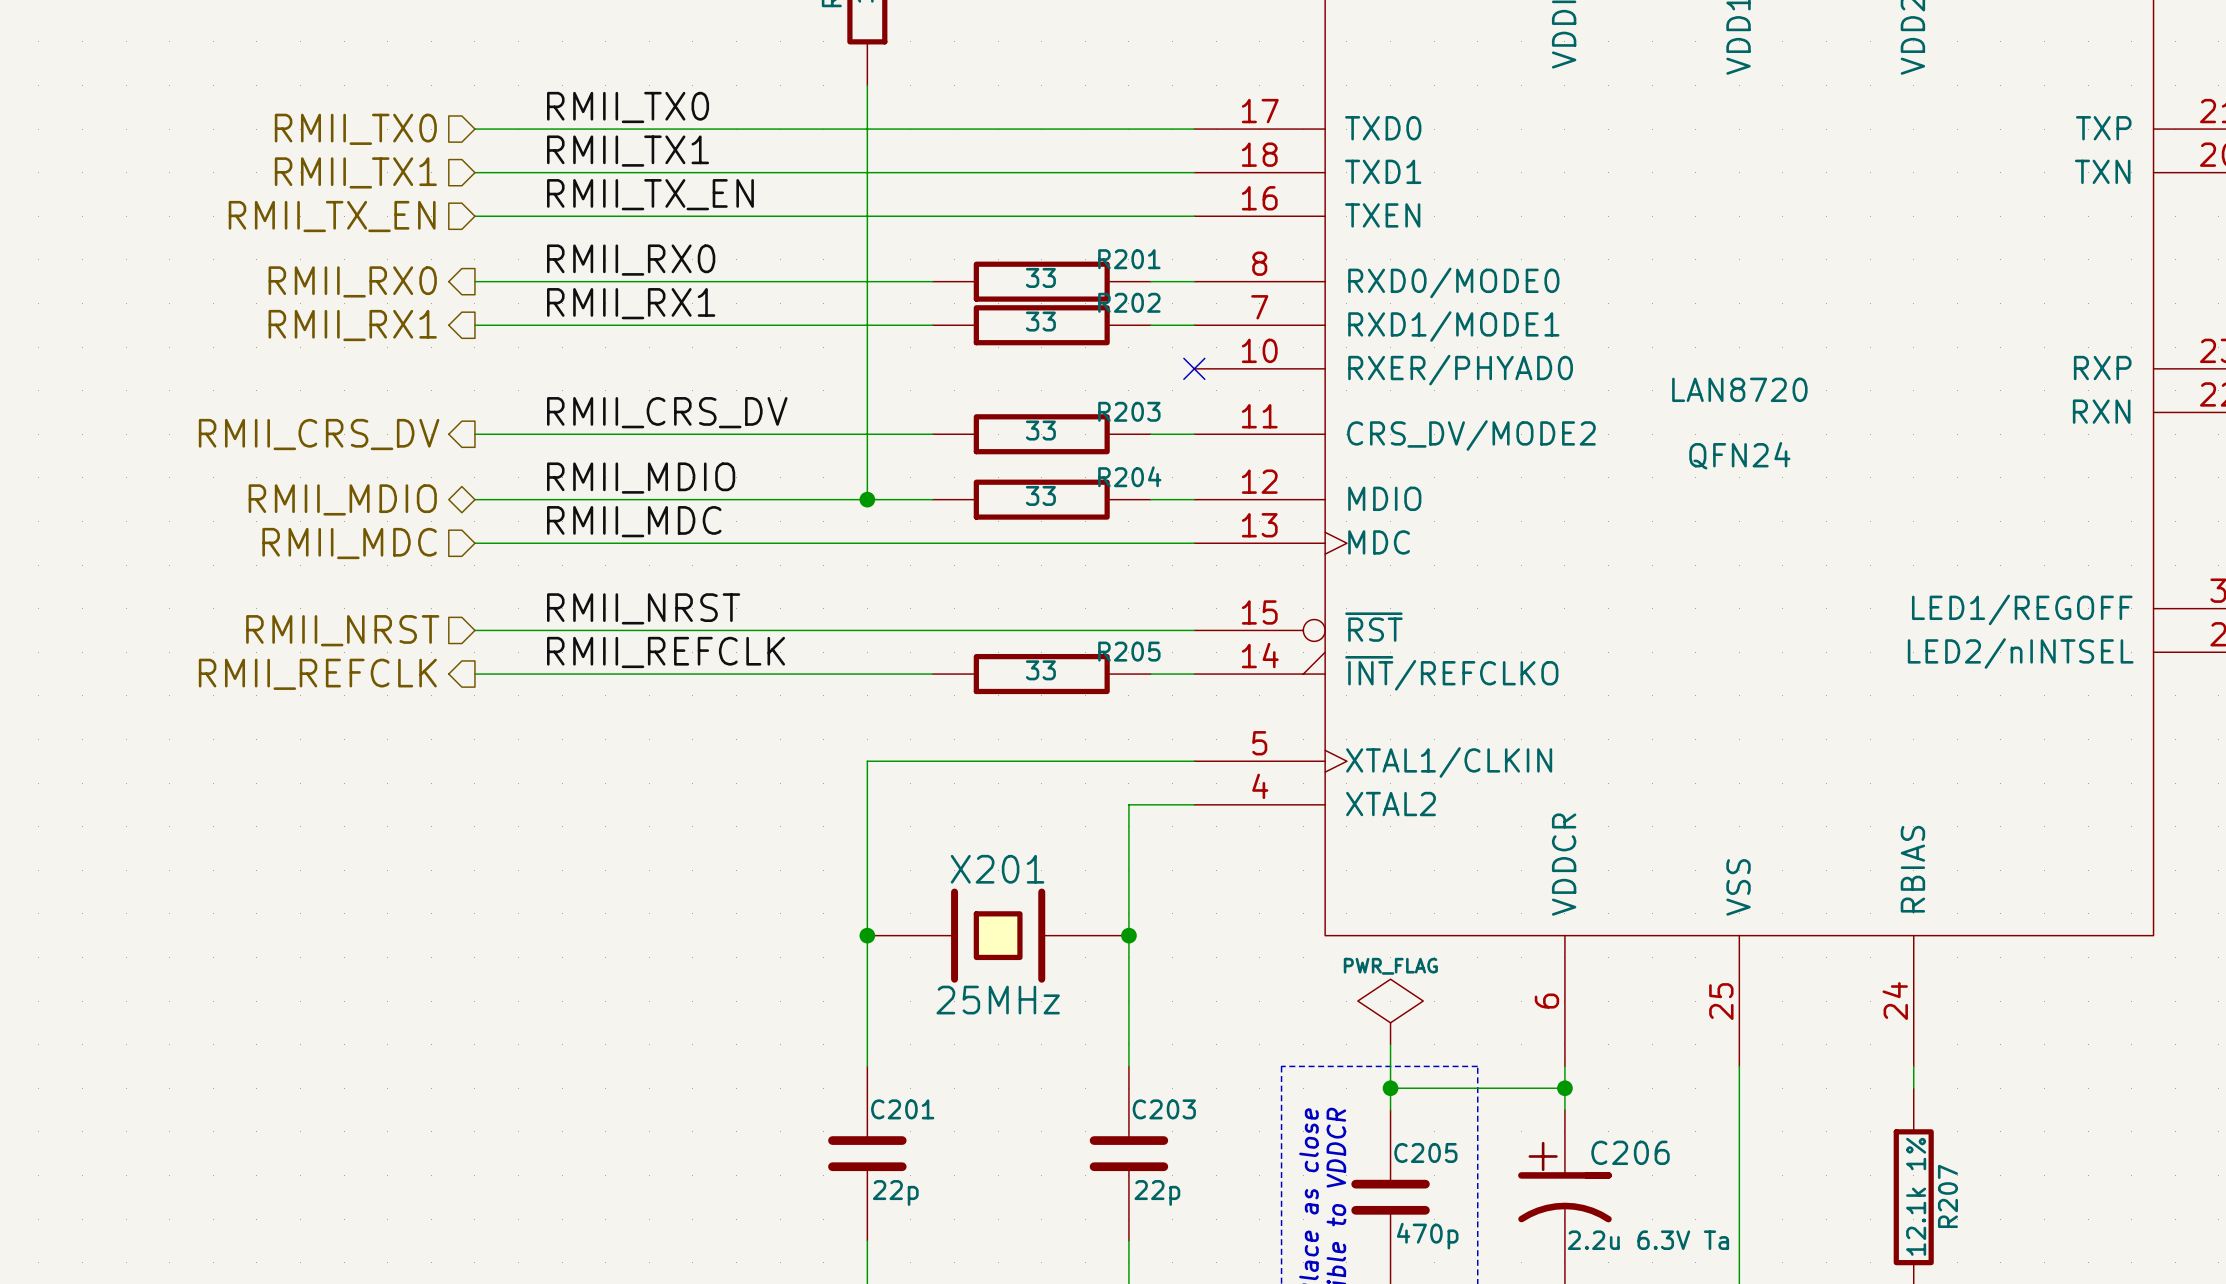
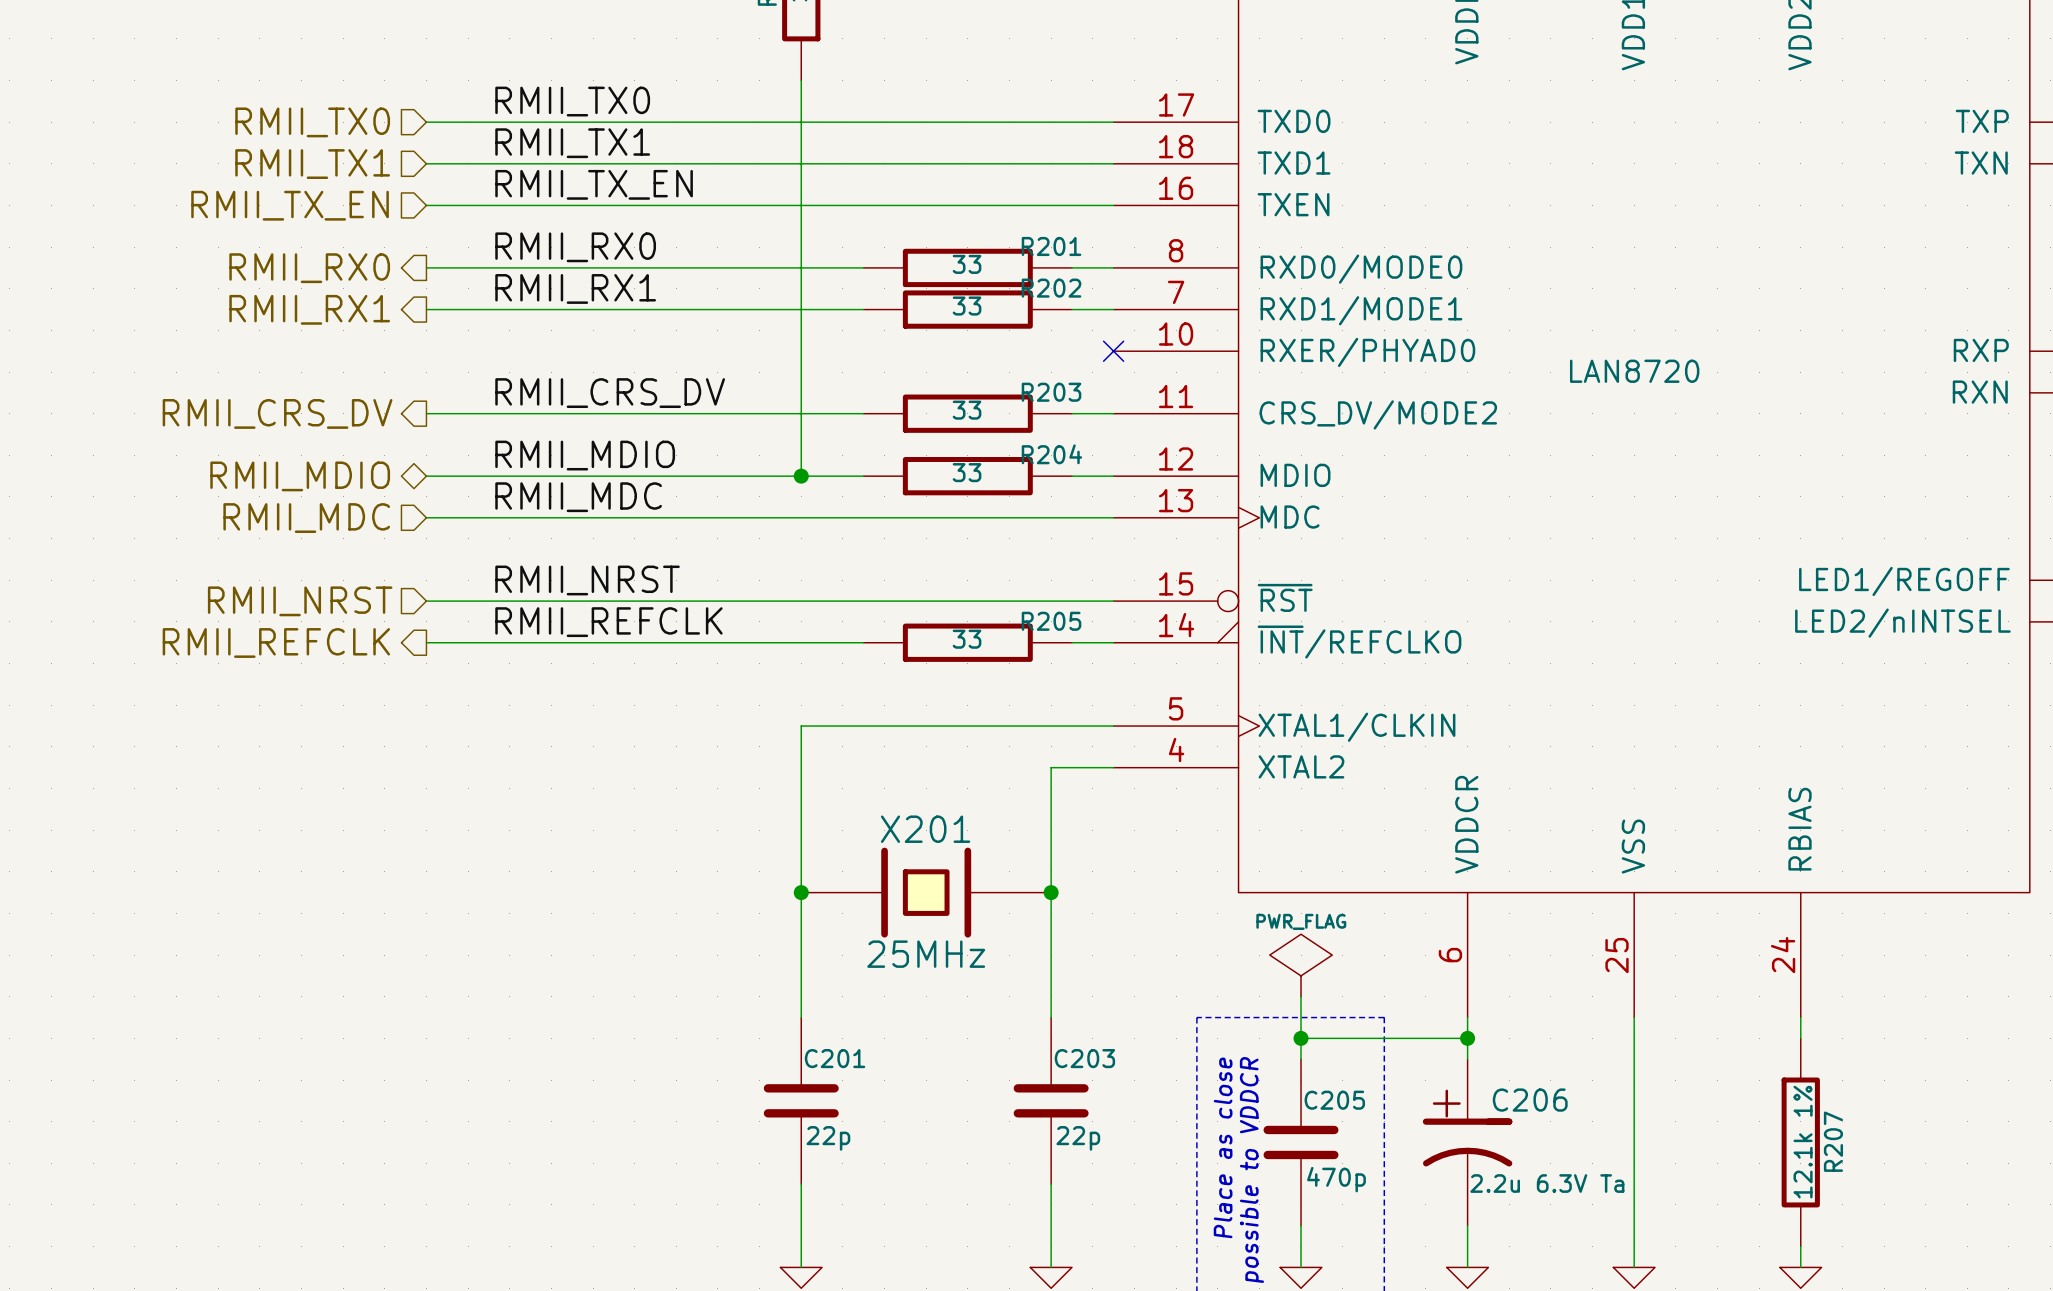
part text: QFN24 (1739, 455) -> none

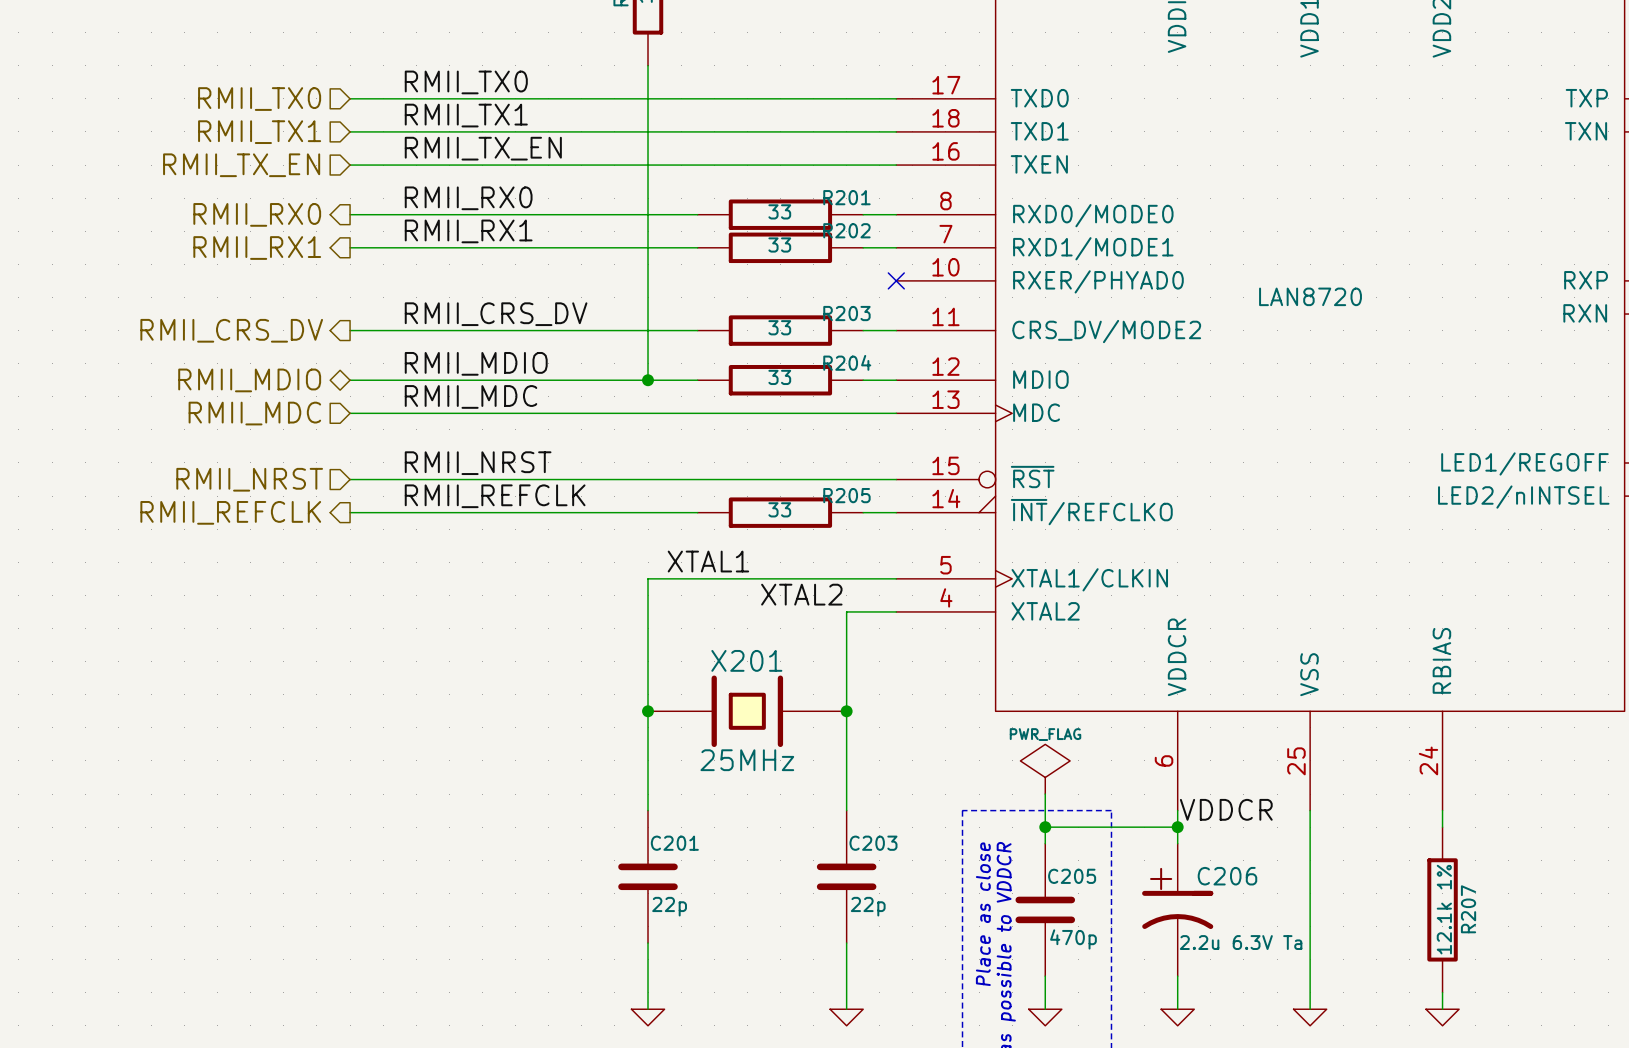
label: none -> XTAL1 (708, 561)
label: none -> XTAL2 (801, 594)
label: none -> VDDCR (1226, 809)

